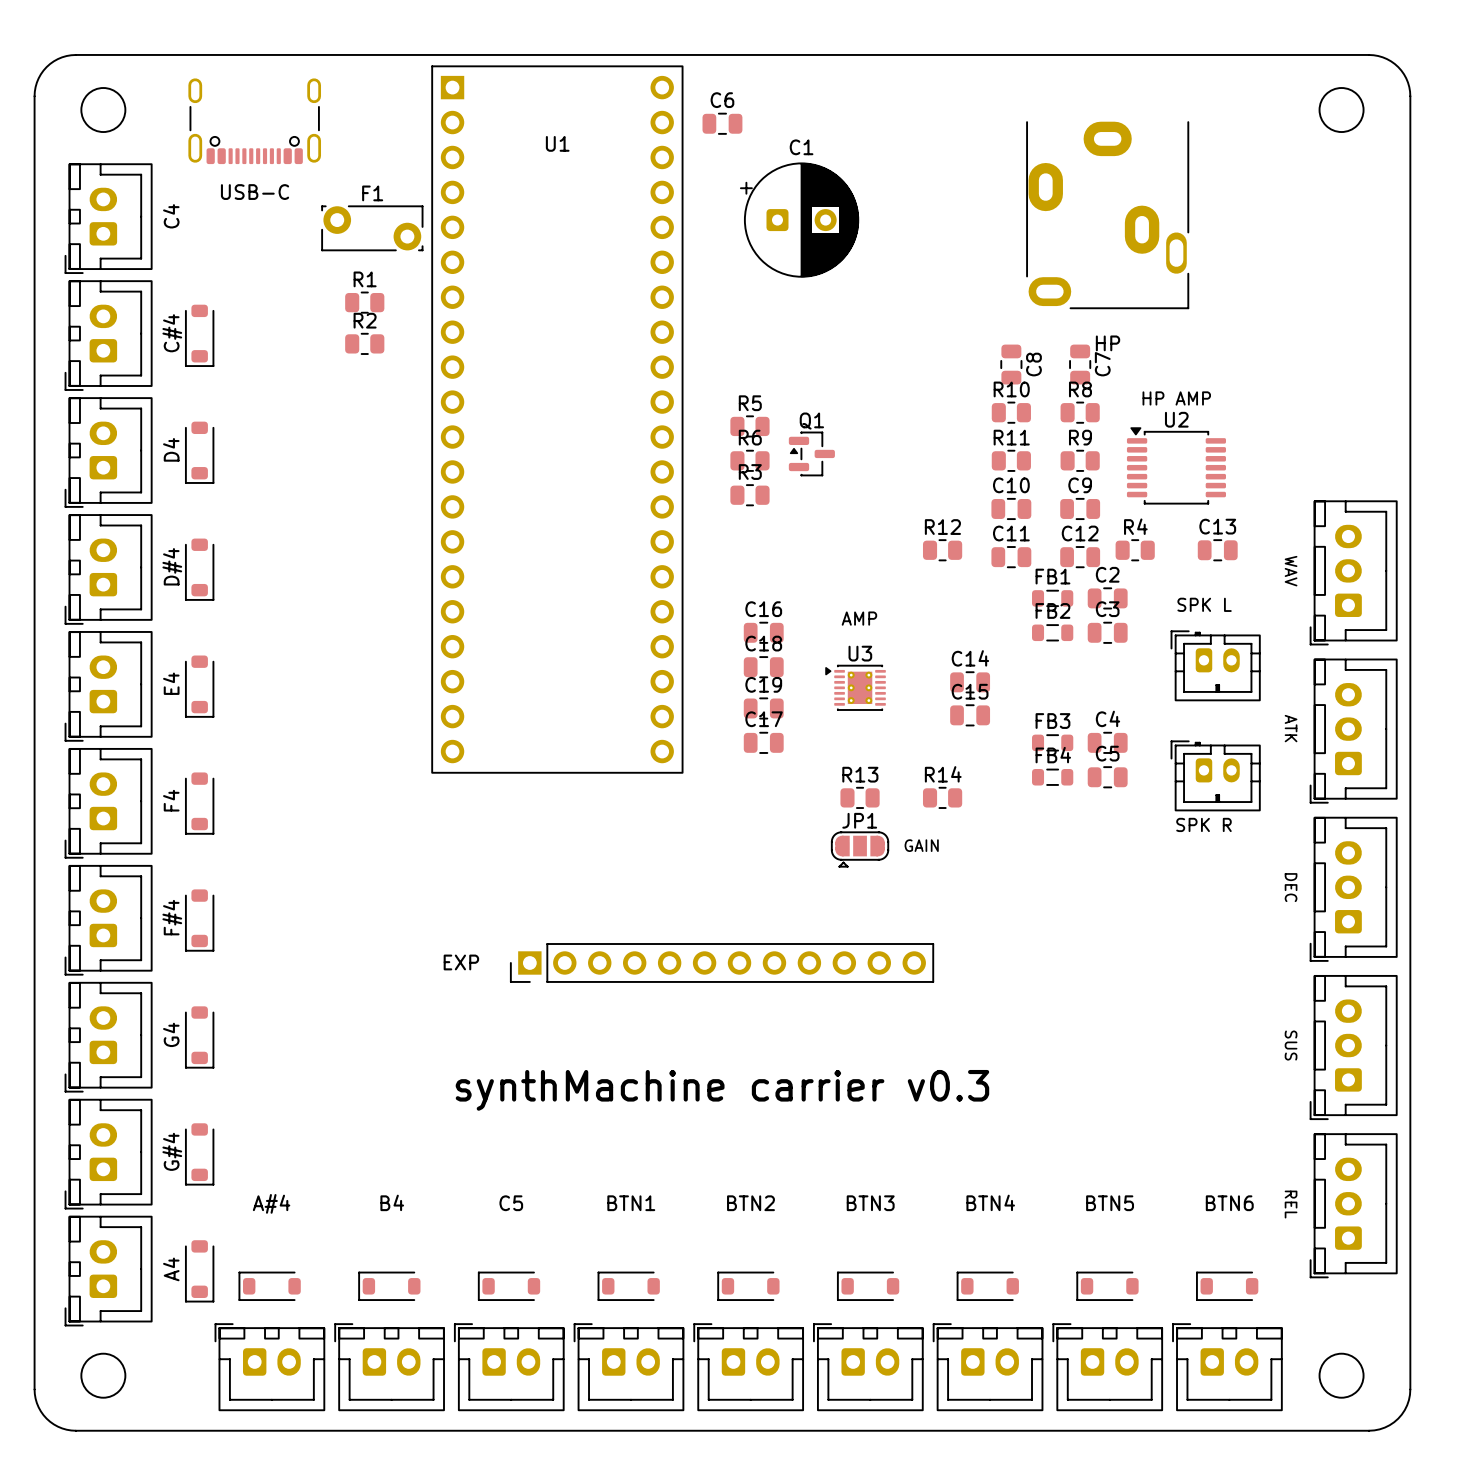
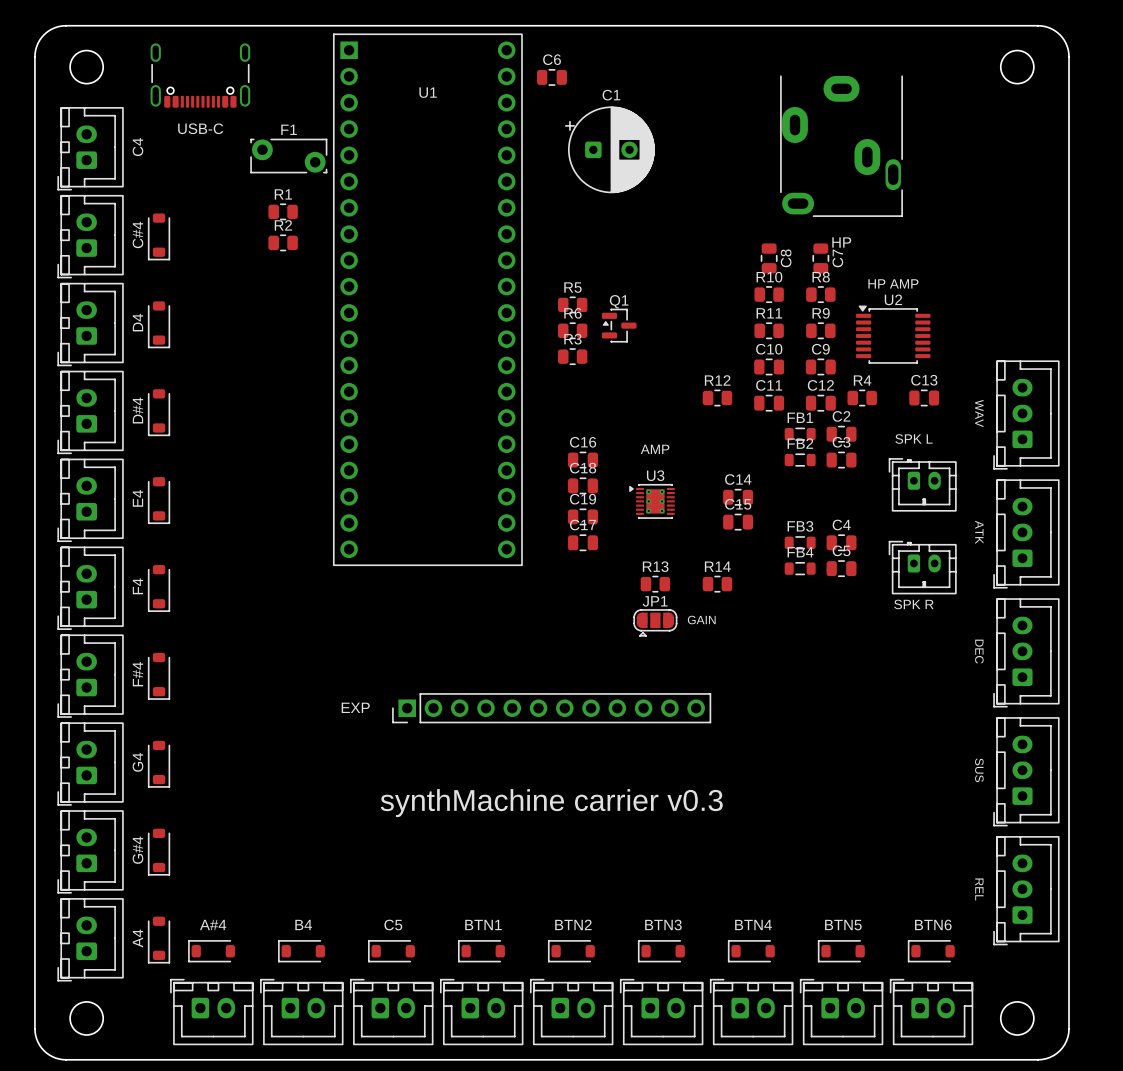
text position: B4 (392, 1202) -> B4 (303, 924)
text position: BTN4 (990, 1202) -> BTN4 (753, 924)
text position: A#4 (271, 1203) -> A#4 (213, 924)
text position: C5 (511, 1203) -> C5 (393, 924)
text position: BTN1 (631, 1203) -> BTN1 (483, 924)
text position: BTN2 (750, 1203) -> BTN2 (573, 924)
text position: BTN3 (870, 1203) -> BTN3 (663, 924)
text position: BTN5 (1110, 1203) -> BTN5 (843, 925)
text position: BTN6 (1229, 1203) -> BTN6 (933, 924)

